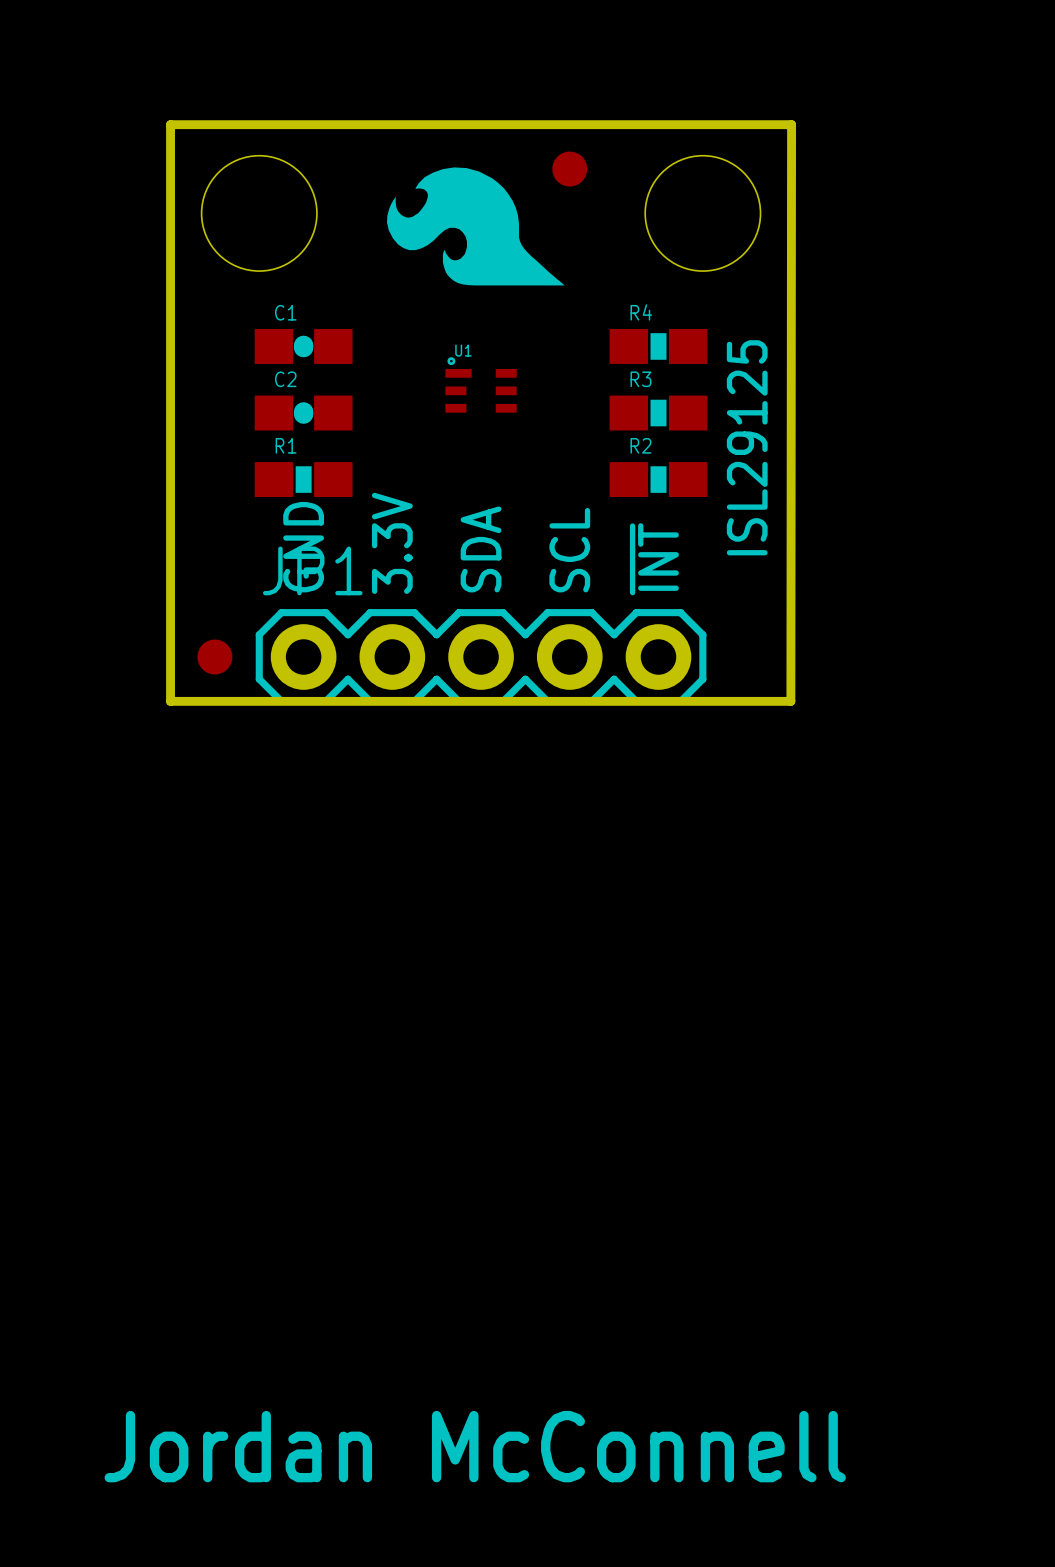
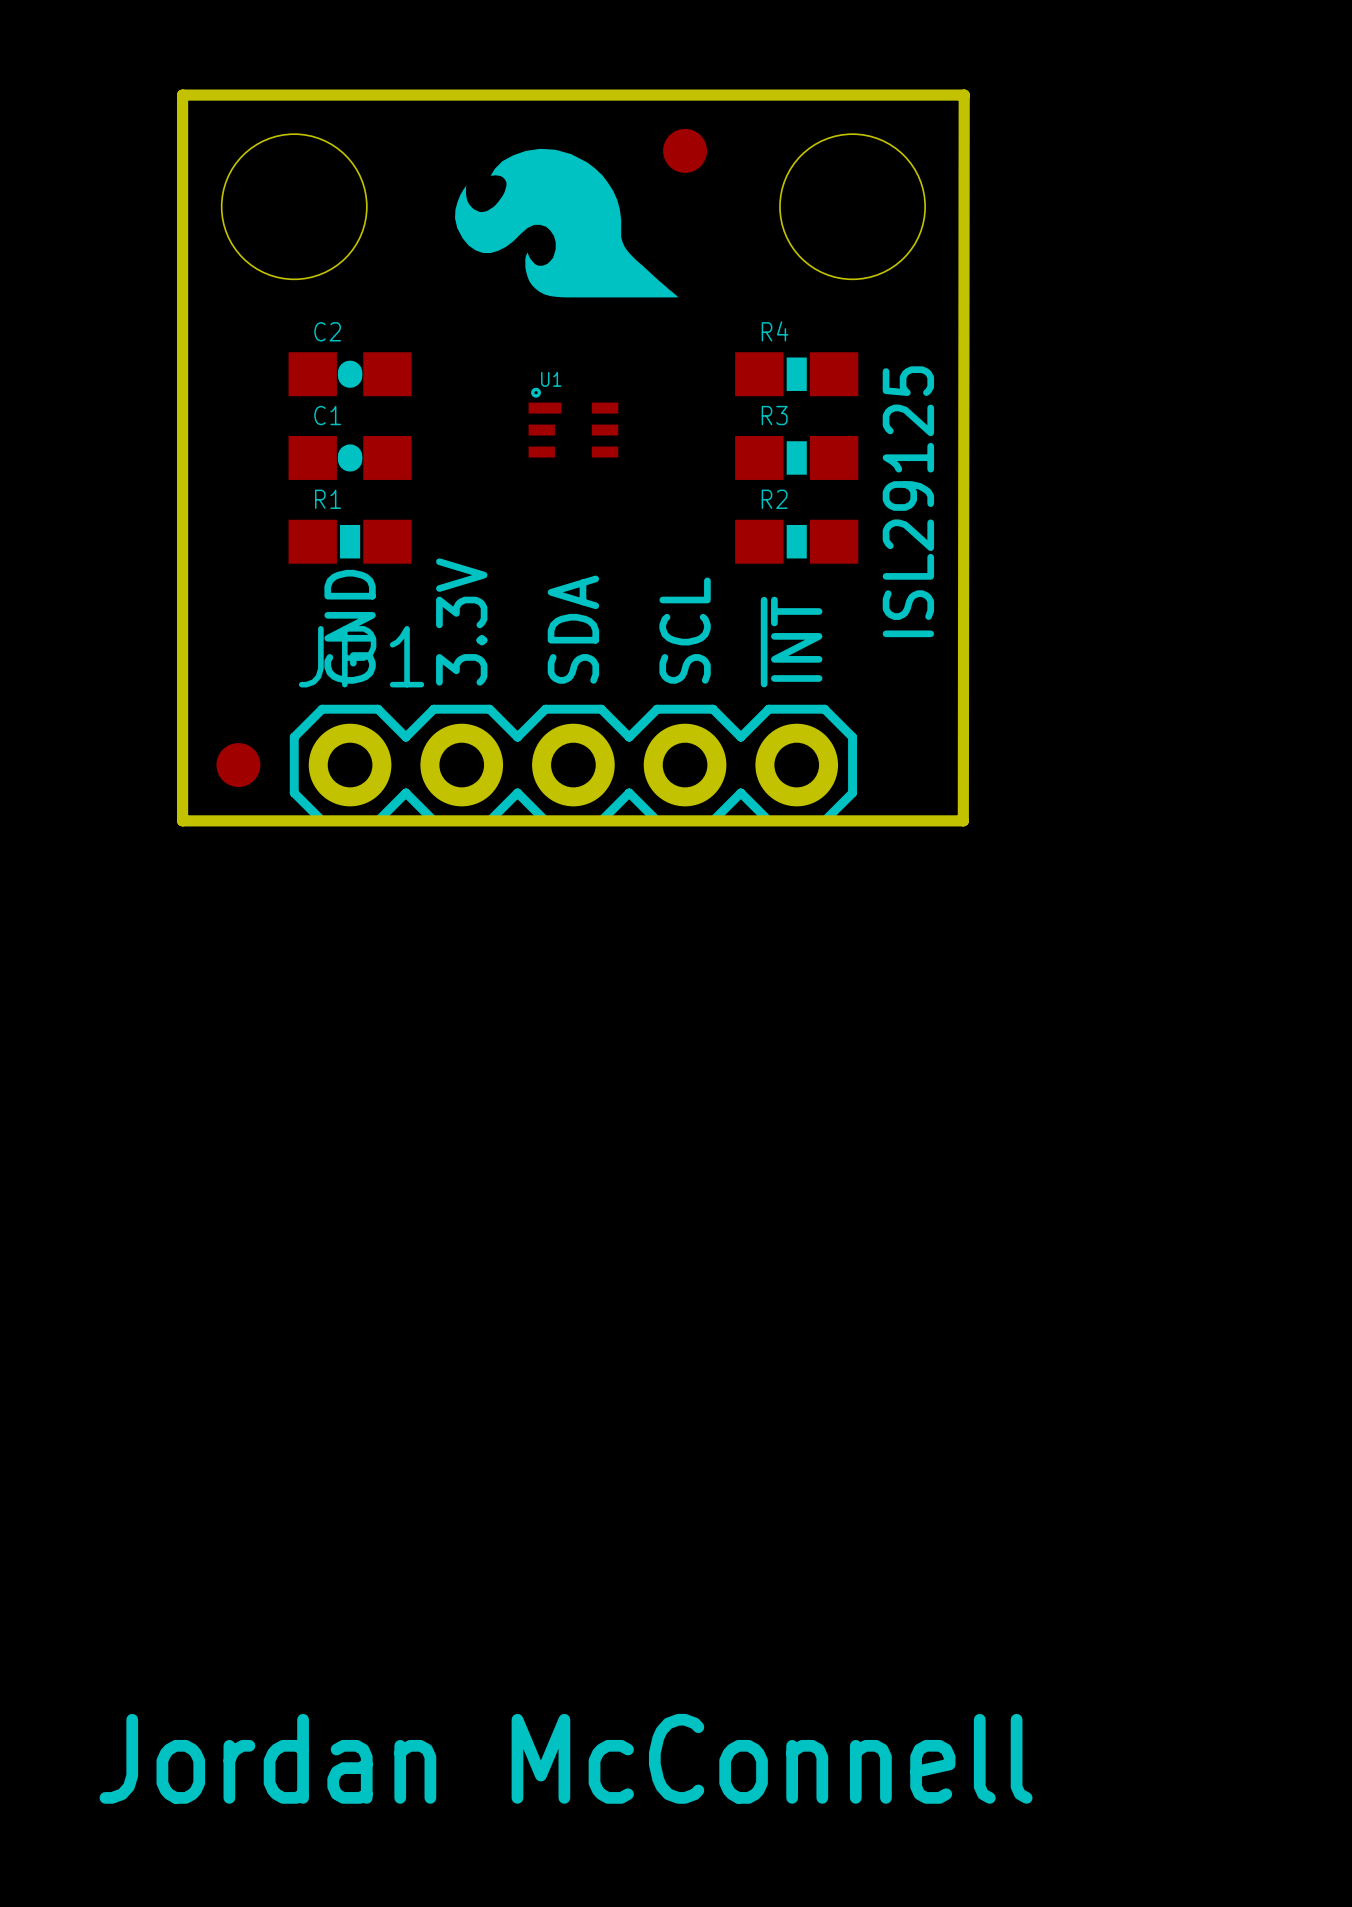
C1 name: C1 (285, 312) -> C2 (327, 331)
C2 name: C2 (285, 379) -> C1 (327, 415)

